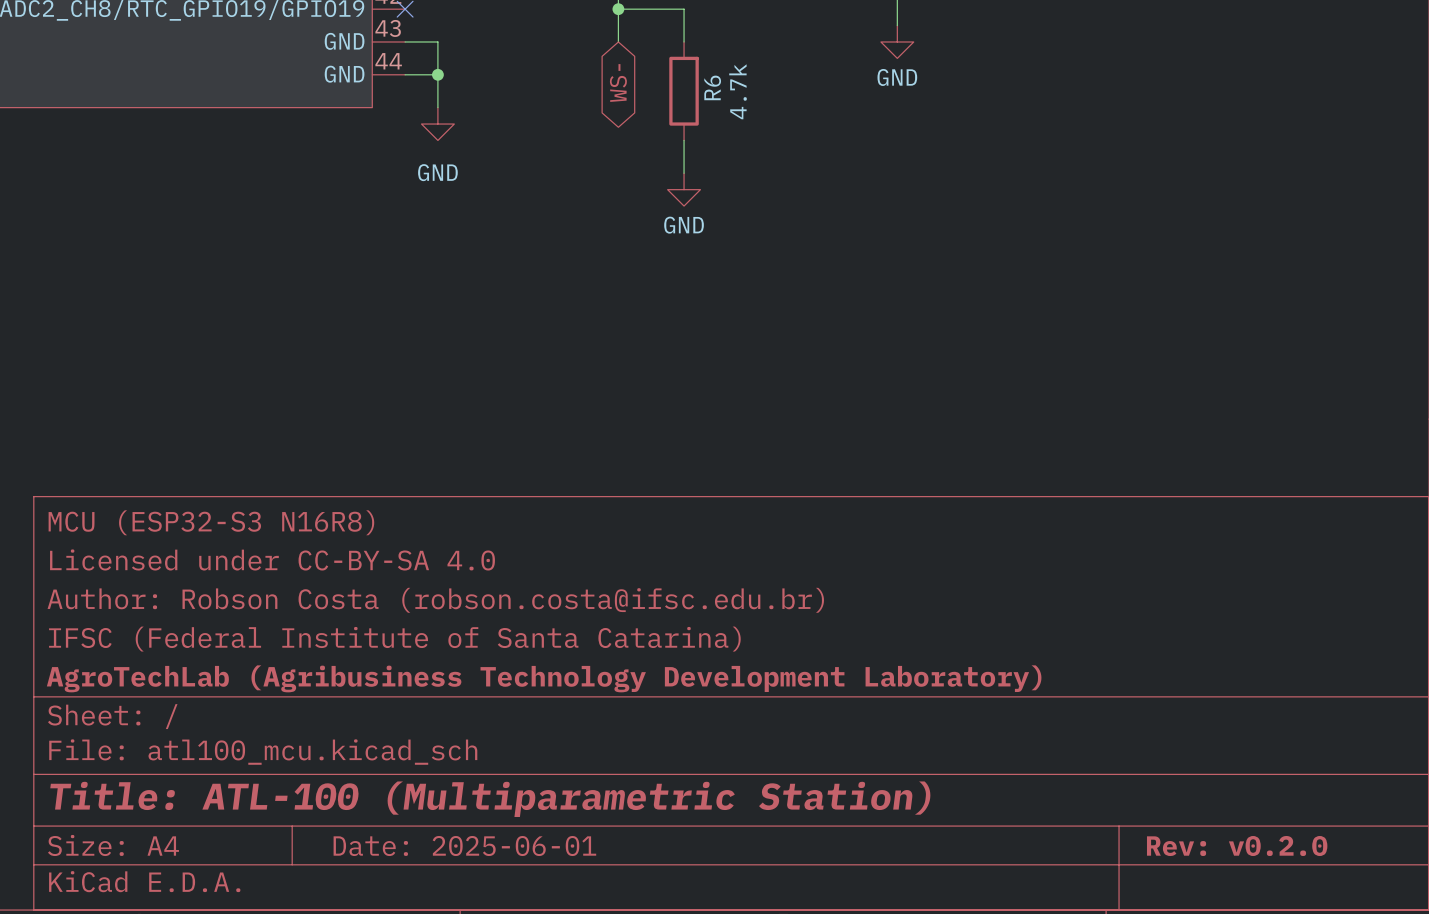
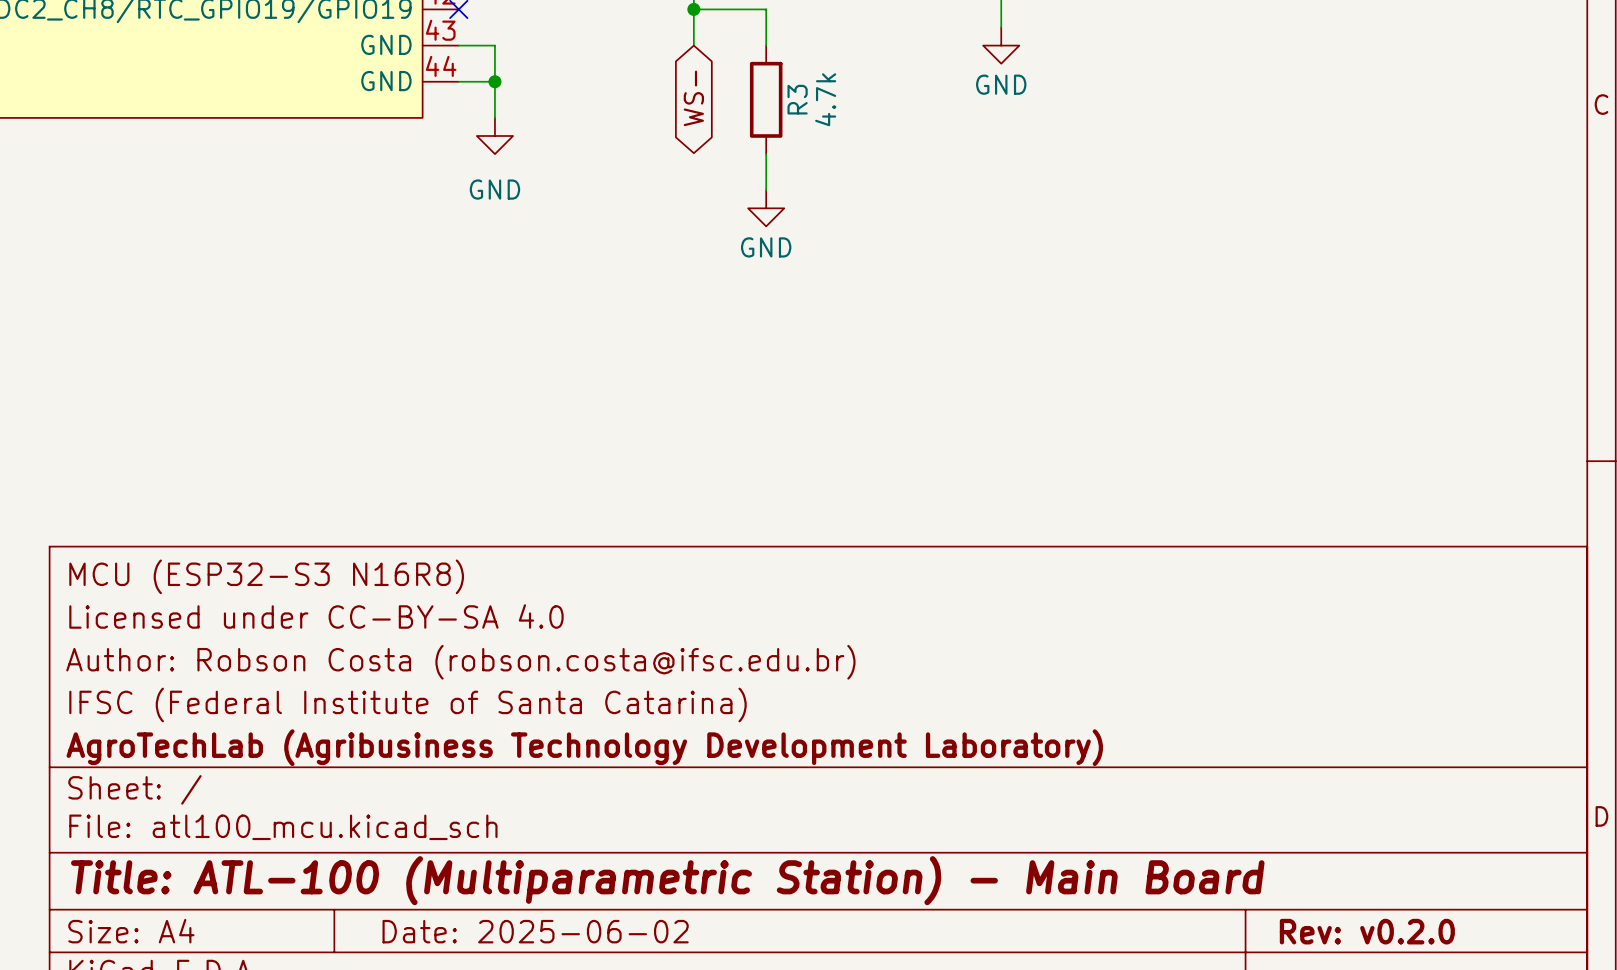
R6 name: R6 (712, 87) -> R3 (797, 99)
title block: Title: ATL-100 (Multiparametric Station) (490, 799) -> Title: ATL-100 (Multiparametric Station) - Main Board (667, 880)
title block: Date: 2025-06-01 (464, 846) -> Date: 2025-06-02 (535, 931)

